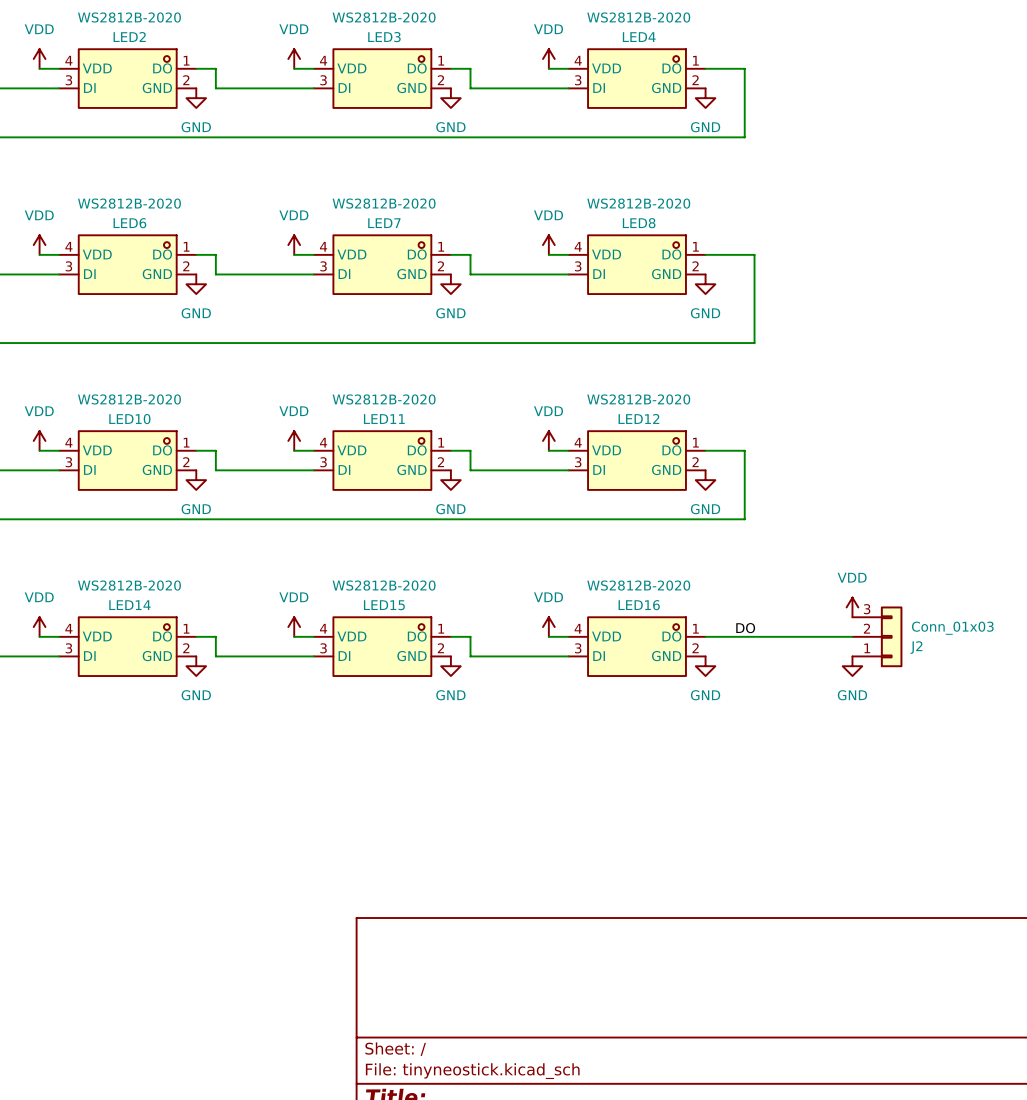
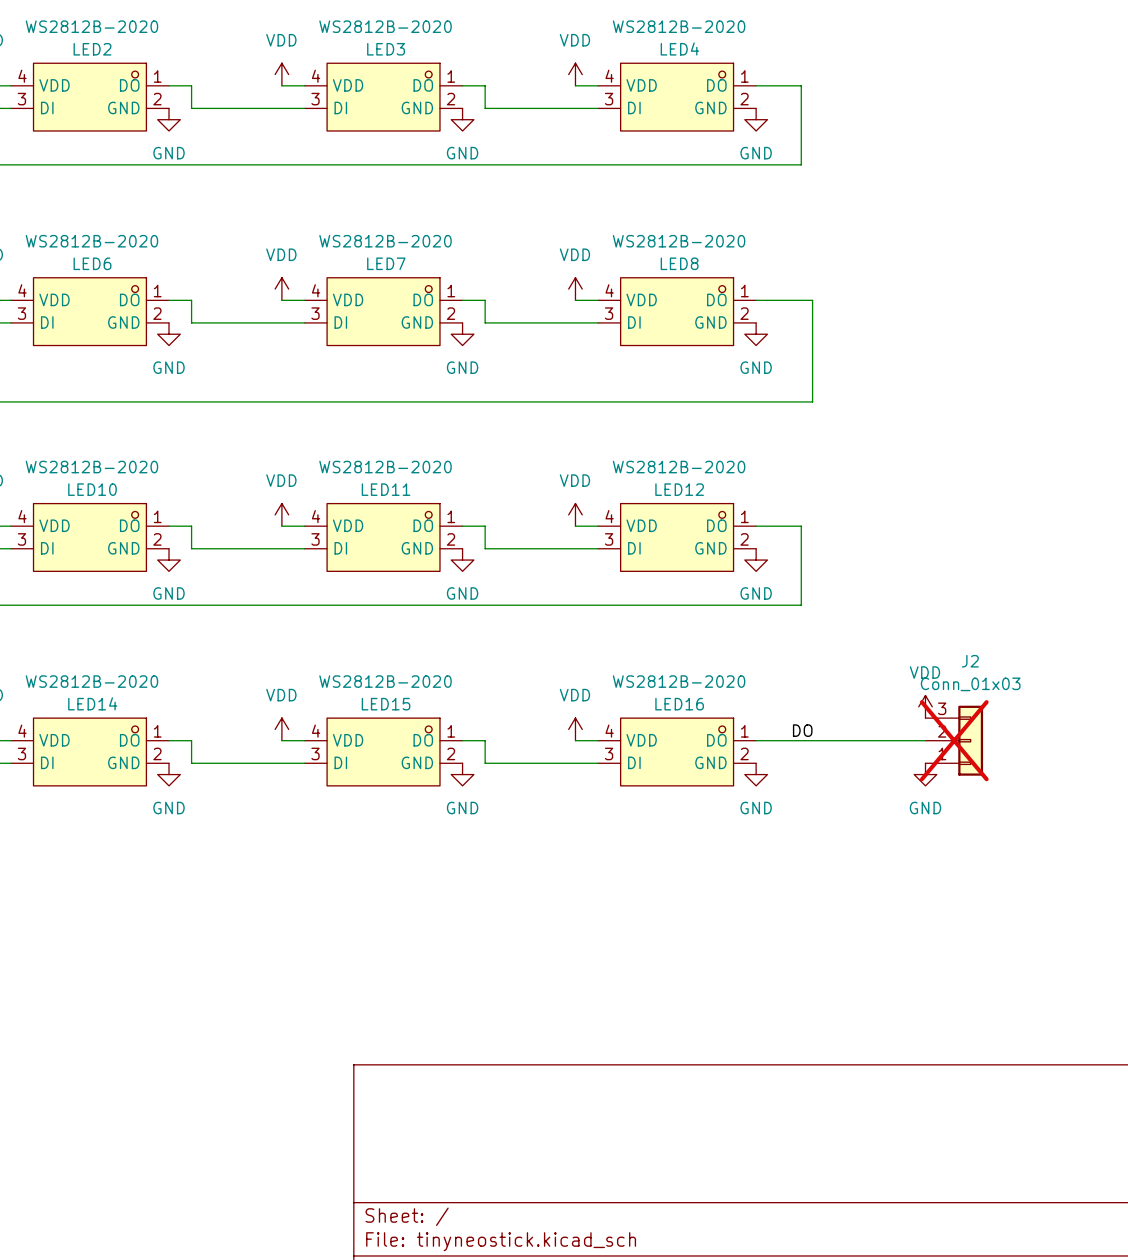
J2 value position: Conn_01x03 (952, 628) -> Conn_01x03 (970, 684)
J2 do-not-place cross: none -> (954, 740)
J2 name position: J2 (916, 647) -> J2 (970, 661)

